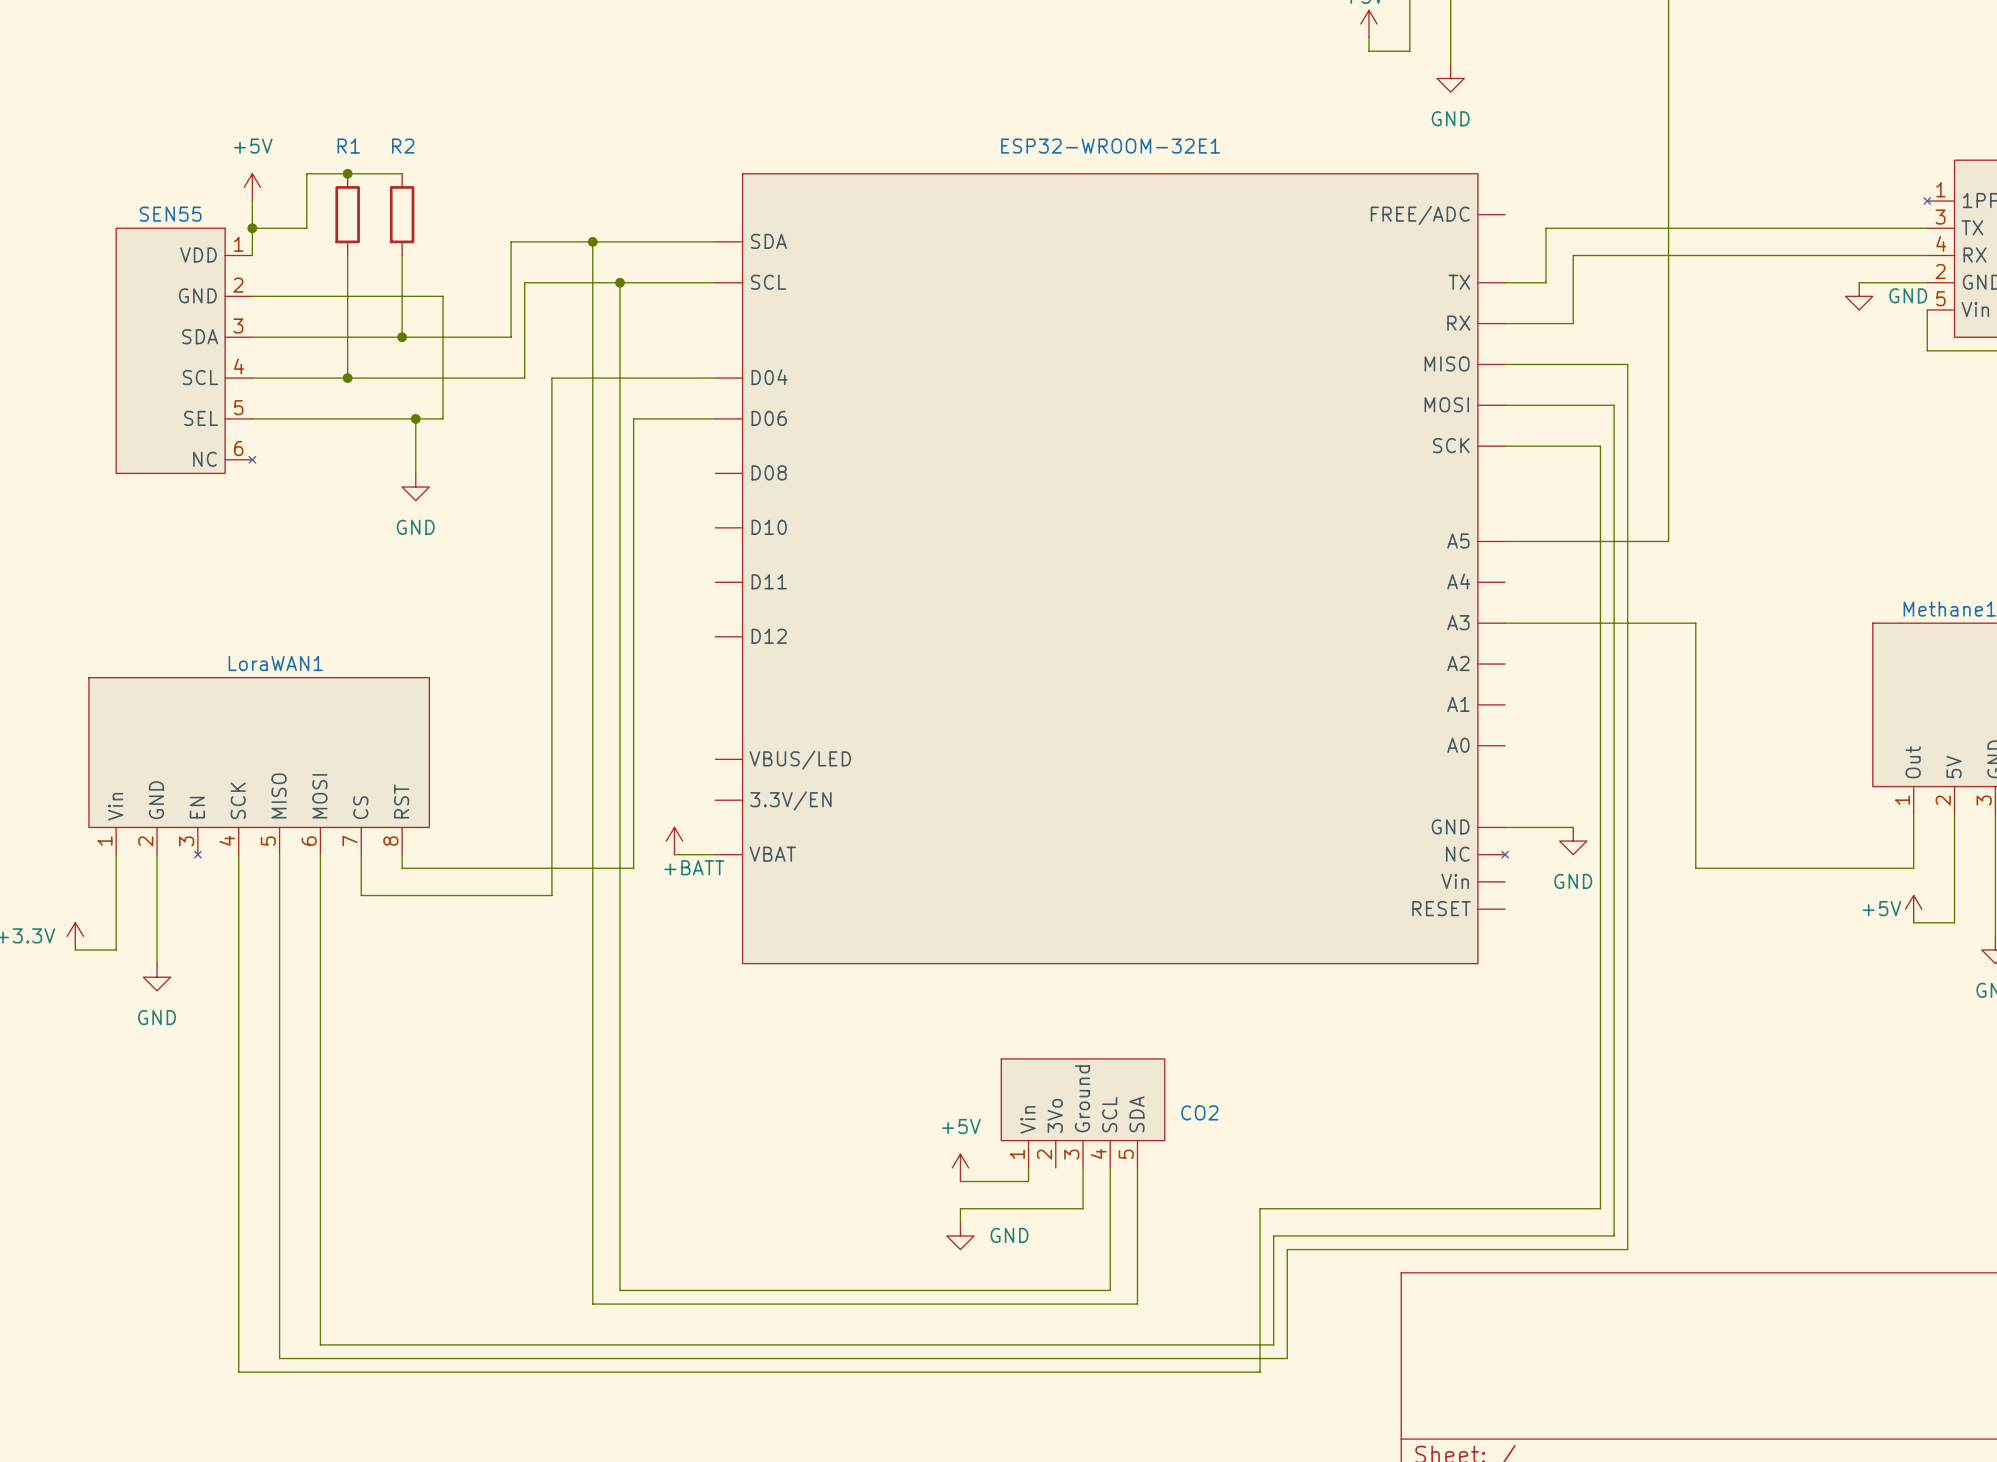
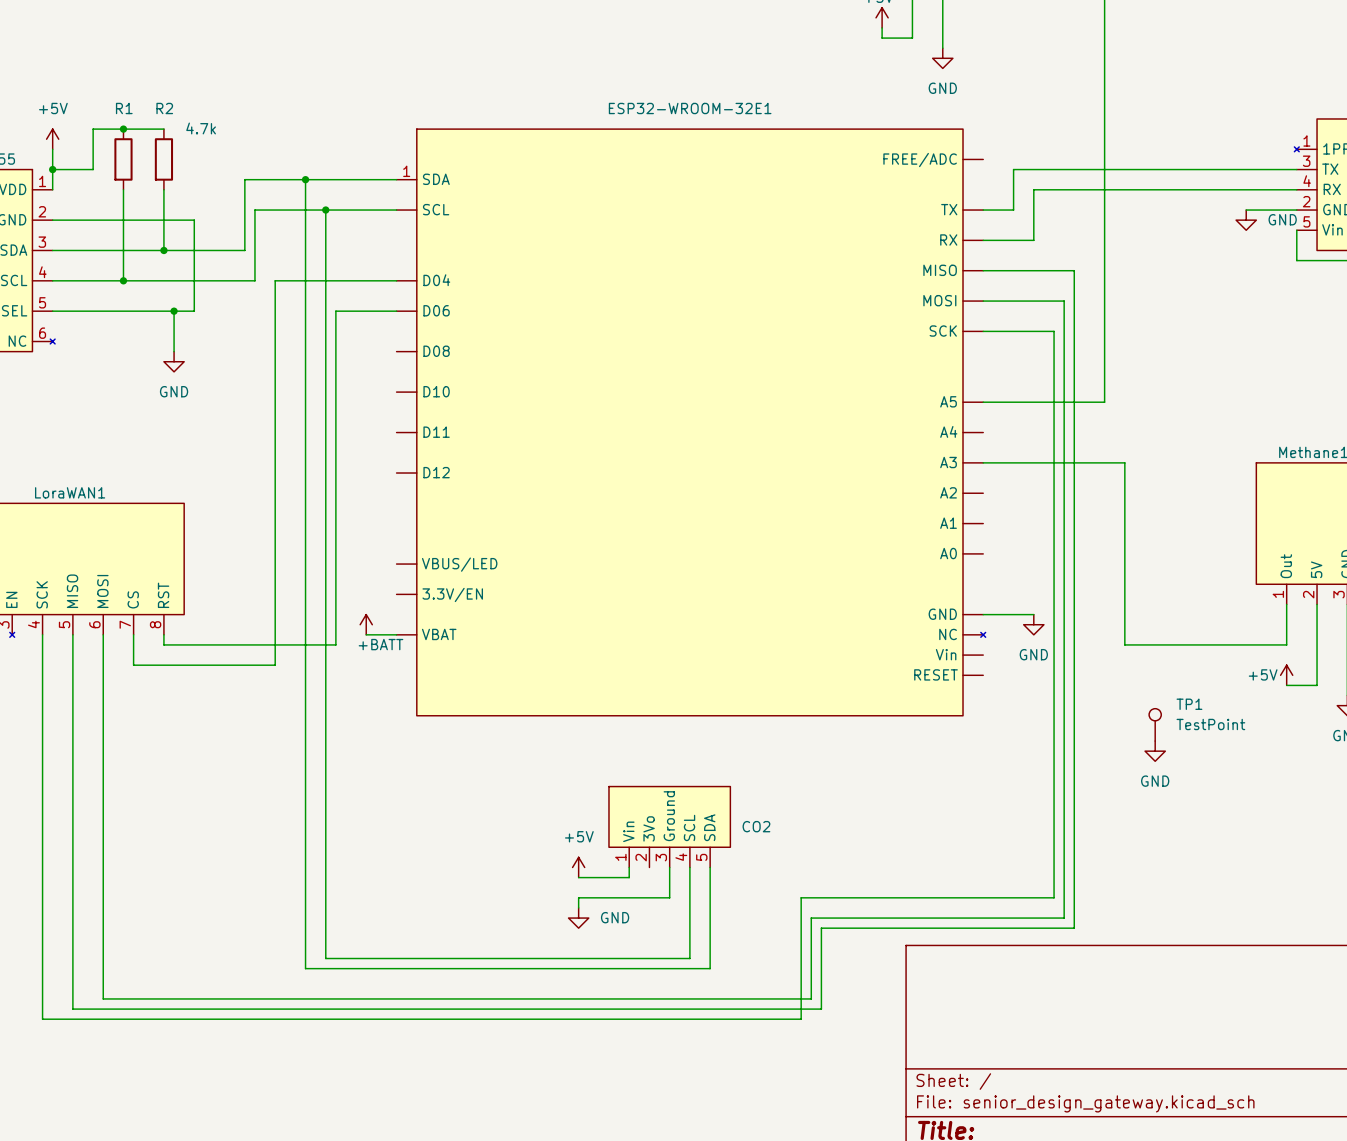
R1 value: none -> 4.7k (201, 128)
ESP32-WROOM-32E1 pin number: none -> 1 (406, 171)
TP1: none -> TestPoint (1155, 724)
power symbol: none -> GND (1155, 751)

